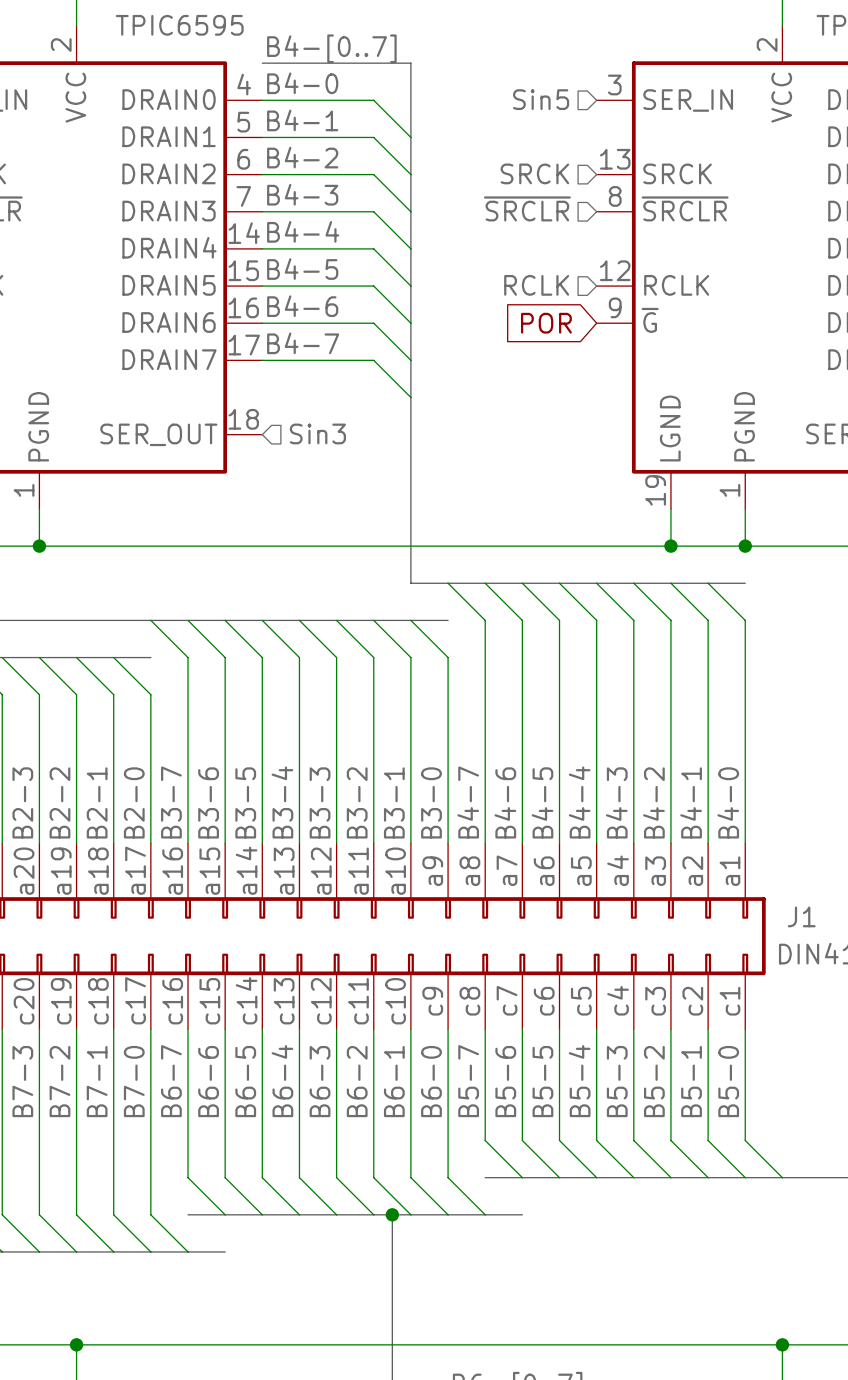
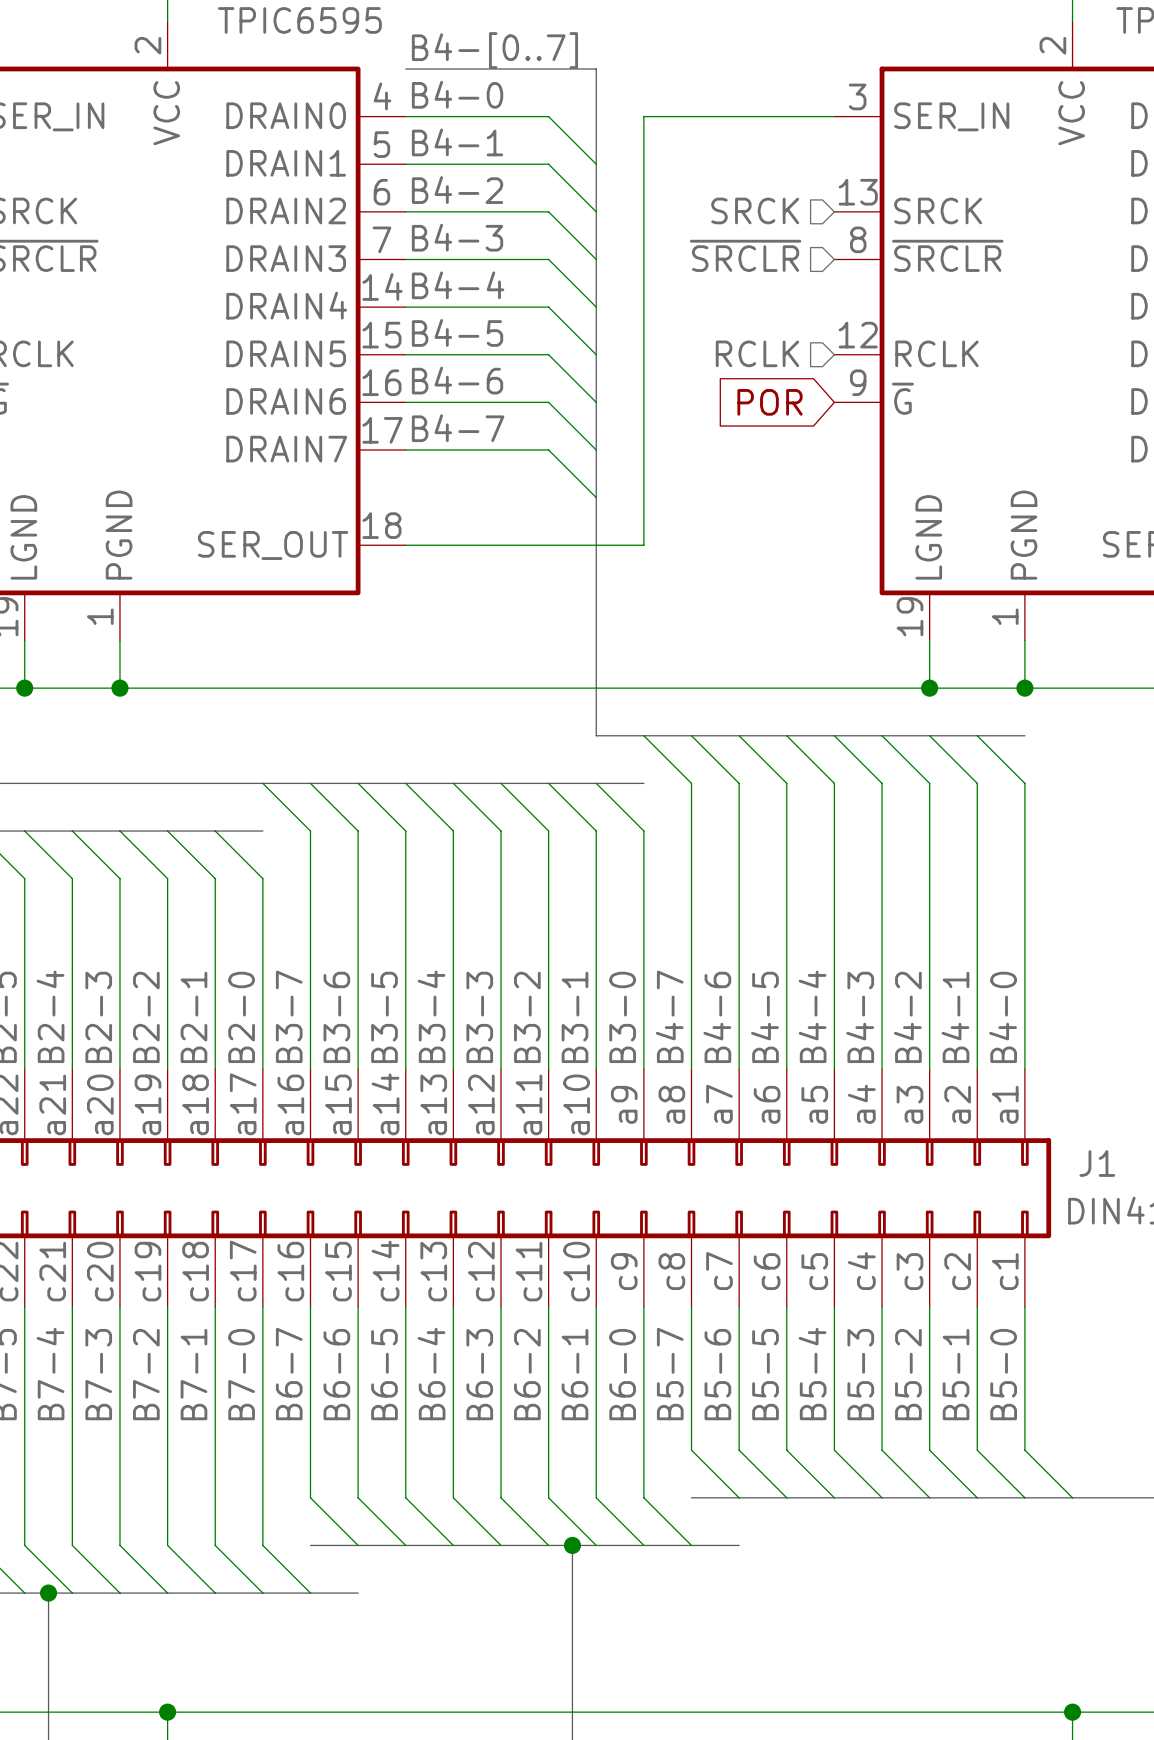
hierarchical label: Sin5 (541, 99) -> none
wire: none -> (834, 116) (643, 116) (643, 545) (405, 545)
hierarchical label: Sin3 (317, 433) -> none

